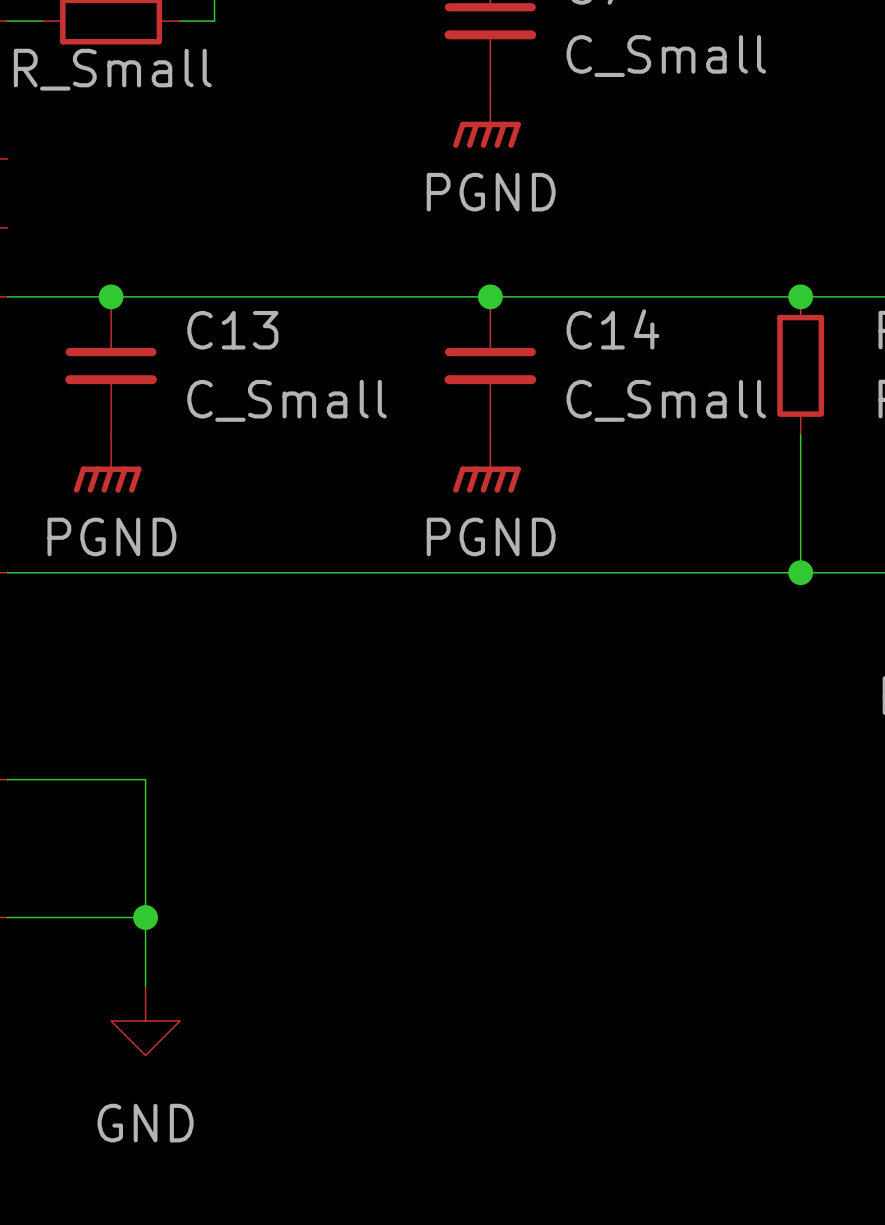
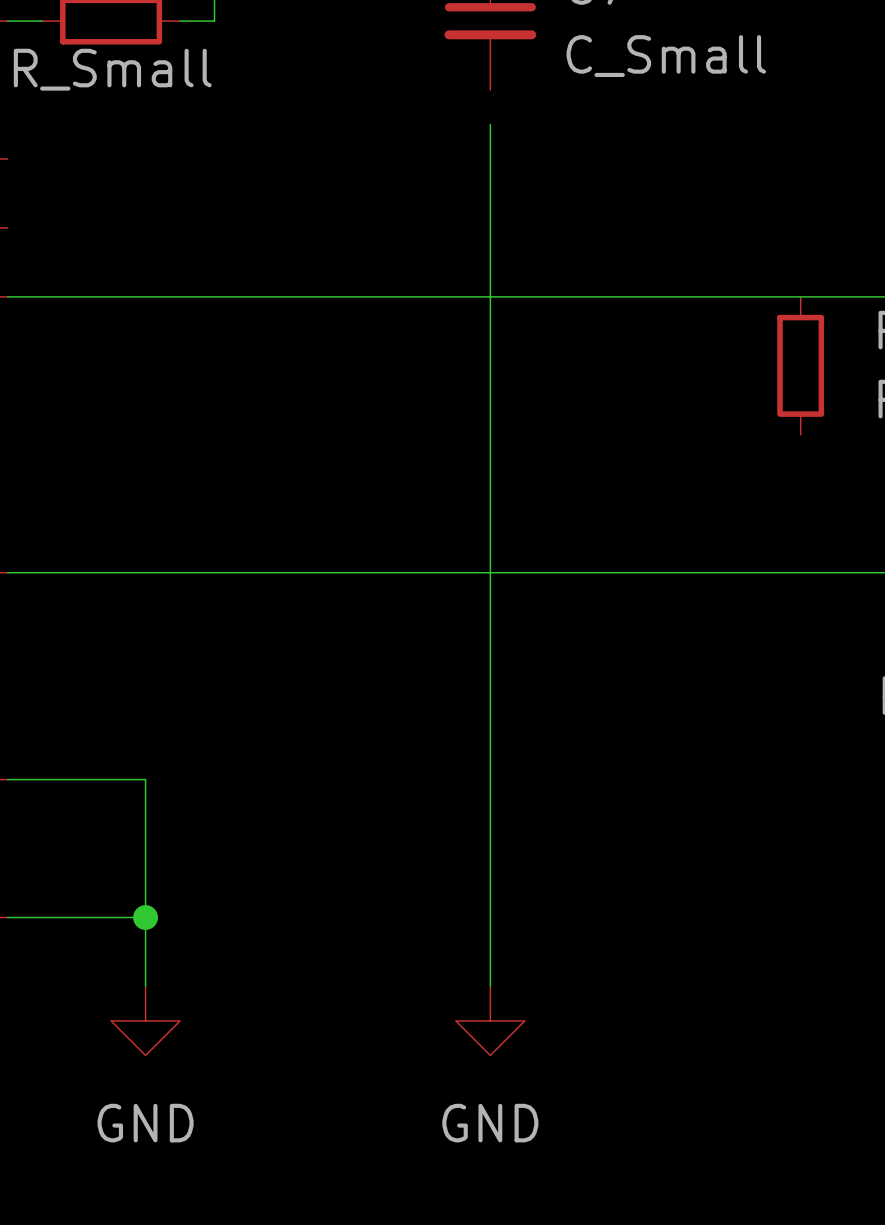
power symbol: PGND (486, 118) -> none
wire: none -> (490, 124) (490, 986)
junction: (111, 296) -> none
junction: (490, 296) -> none
junction: (800, 296) -> none
C13: C_Small (111, 365) -> none
C14: C_Small (490, 365) -> none
wire: (800, 434) (800, 572) -> none
power symbol: PGND (107, 463) -> none
power symbol: PGND (486, 463) -> none
junction: (800, 572) -> none
power symbol: none -> GND (490, 1020)

